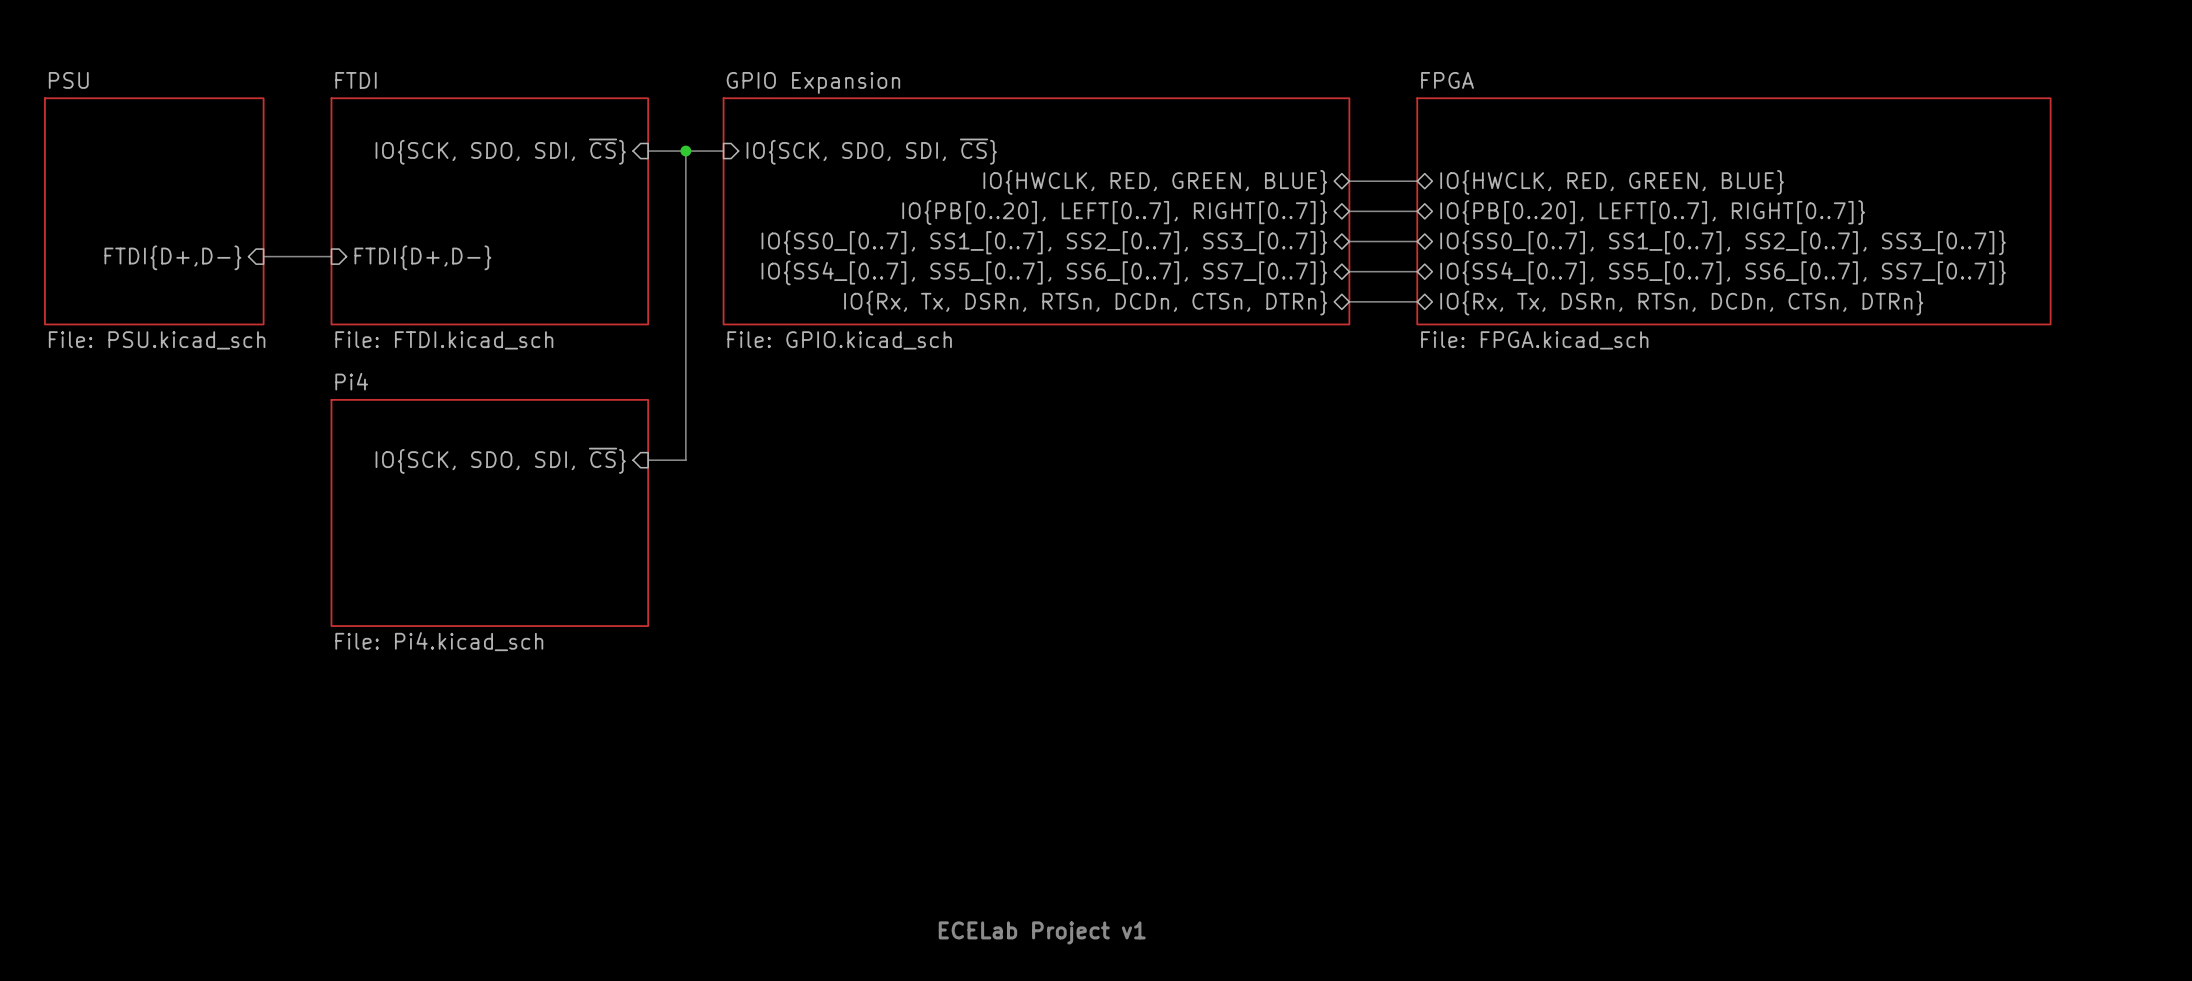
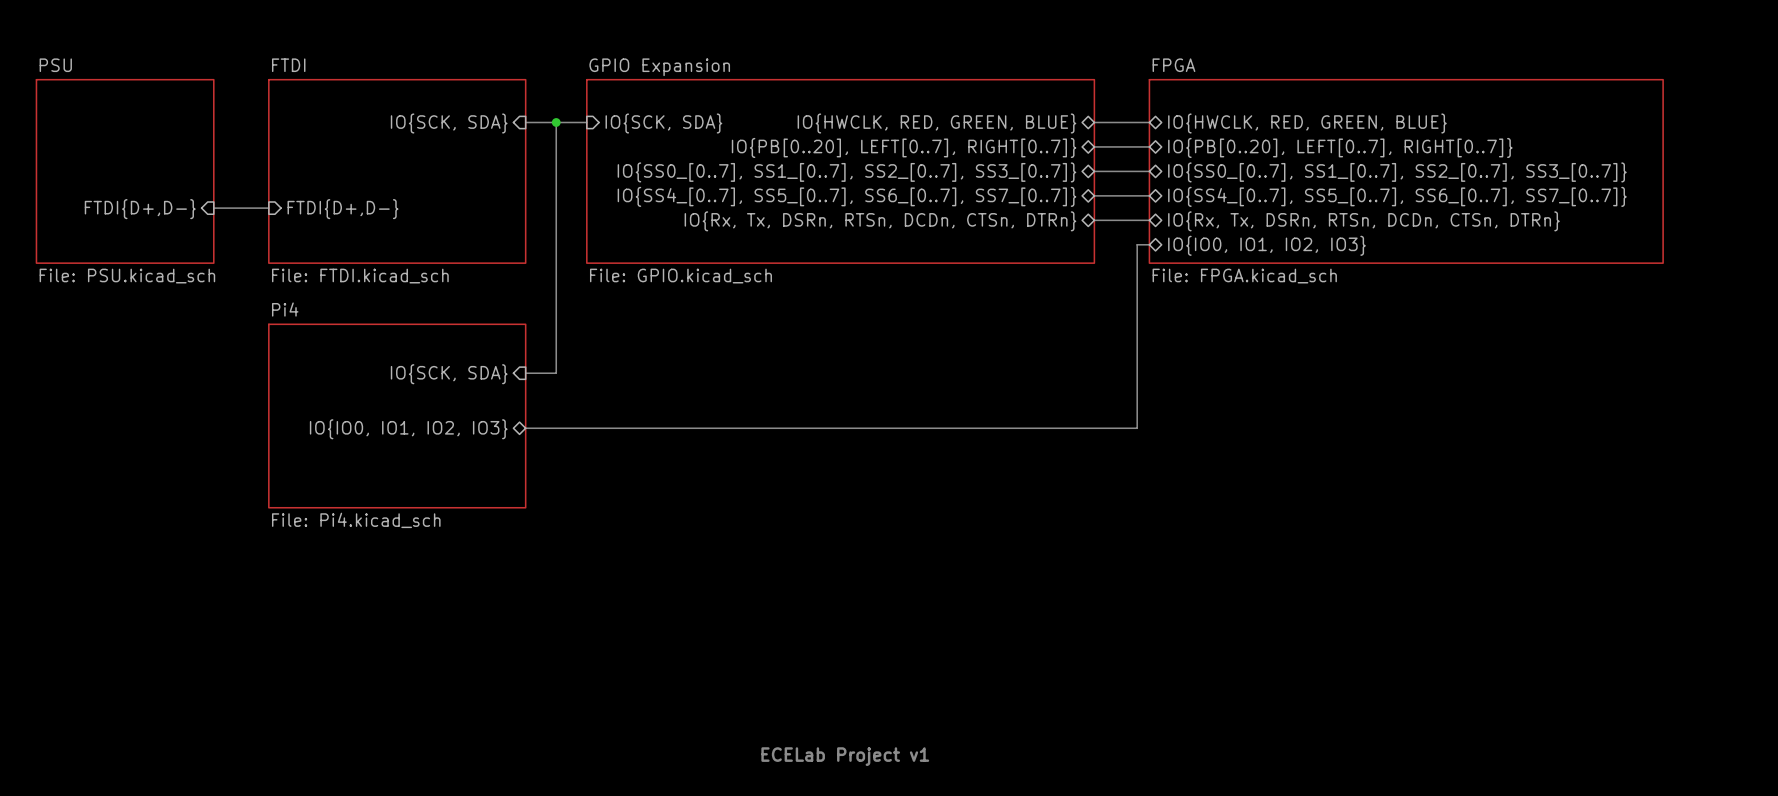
sheet pin: IO{SCK, SDO, SDI, ~{CS}} (500, 151) -> IO{SCK, SDA} (449, 123)
sheet pin: IO{SCK, SDO, SDI, ~{CS}} (871, 151) -> IO{SCK, SDA} (663, 123)
bus: none -> (1094, 122) (1149, 122)
sheet pin: none -> IO{HWCLK, RED, GREEN, BLUE} (936, 123)
sheet pin: none -> IO{HWCLK, RED, GREEN, BLUE} (1307, 123)
sheet pin: IO{HWCLK, RED, GREEN, BLUE} (1155, 182) -> IO{PB[0..20], LEFT[0..7], RIGHT[0..7]} (904, 147)
sheet pin: IO{HWCLK, RED, GREEN, BLUE} (1612, 182) -> IO{PB[0..20], LEFT[0..7], RIGHT[0..7]} (1340, 147)
sheet pin: IO{PB[0..20], LEFT[0..7], RIGHT[0..7]} (1114, 212) -> IO{SS0_[0..7], SS1_[0..7], SS2_[0..7], SS3_[0..7]} (846, 172)
sheet pin: IO{PB[0..20], LEFT[0..7], RIGHT[0..7]} (1652, 212) -> IO{SS0_[0..7], SS1_[0..7], SS2_[0..7], SS3_[0..7]} (1397, 172)
sheet pin: IO{SS0_[0..7], SS1_[0..7], SS2_[0..7], SS3_[0..7]} (1044, 242) -> IO{SS4_[0..7], SS5_[0..7], SS6_[0..7], SS7_[0..7]} (846, 196)
sheet pin: IO{SS0_[0..7], SS1_[0..7], SS2_[0..7], SS3_[0..7]} (1723, 242) -> IO{SS4_[0..7], SS5_[0..7], SS6_[0..7], SS7_[0..7]} (1397, 196)
sheet pin: IO{SS4_[0..7], SS5_[0..7], SS6_[0..7], SS7_[0..7]} (1044, 272) -> IO{Rx, Tx, DSRn, RTSn, DCDn, CTSn, DTRn} (880, 221)
sheet pin: IO{SS4_[0..7], SS5_[0..7], SS6_[0..7], SS7_[0..7]} (1723, 272) -> IO{Rx, Tx, DSRn, RTSn, DCDn, CTSn, DTRn} (1363, 221)
bus: (1349, 301) (1402, 301) -> (525, 428) (1137, 428) (1137, 244)
sheet pin: IO{Rx, Tx, DSRn, RTSn, DCDn, CTSn, DTRn} (1085, 303) -> none
sheet pin: IO{Rx, Tx, DSRn, RTSn, DCDn, CTSn, DTRn} (1681, 303) -> IO{IO0, IO1, IO2, IO3} (1266, 245)
sheet pin: IO{SCK, SDO, SDI, ~{CS}} (500, 460) -> IO{SCK, SDA} (449, 374)
sheet pin: none -> IO{IO0, IO1, IO2, IO3} (408, 429)

